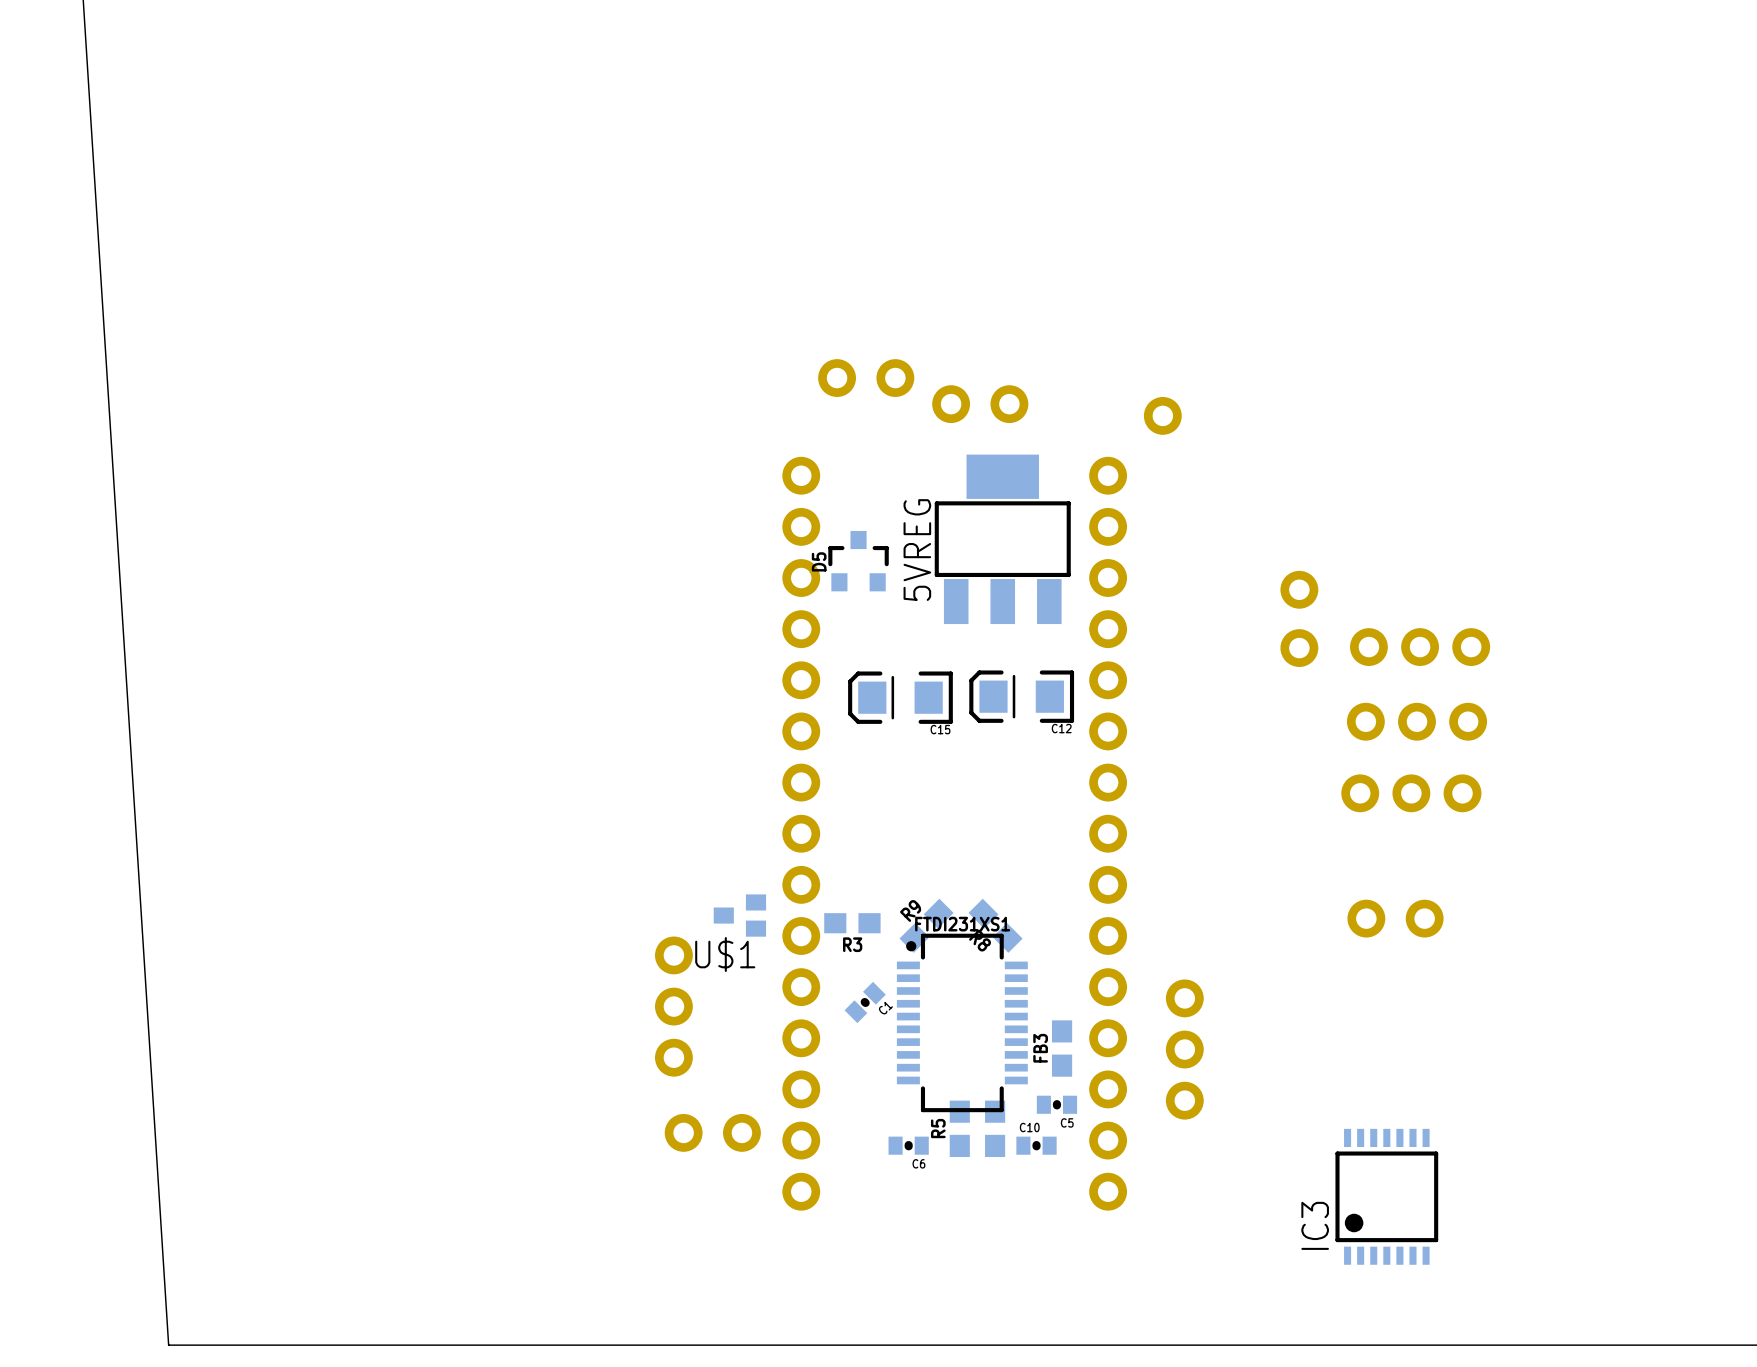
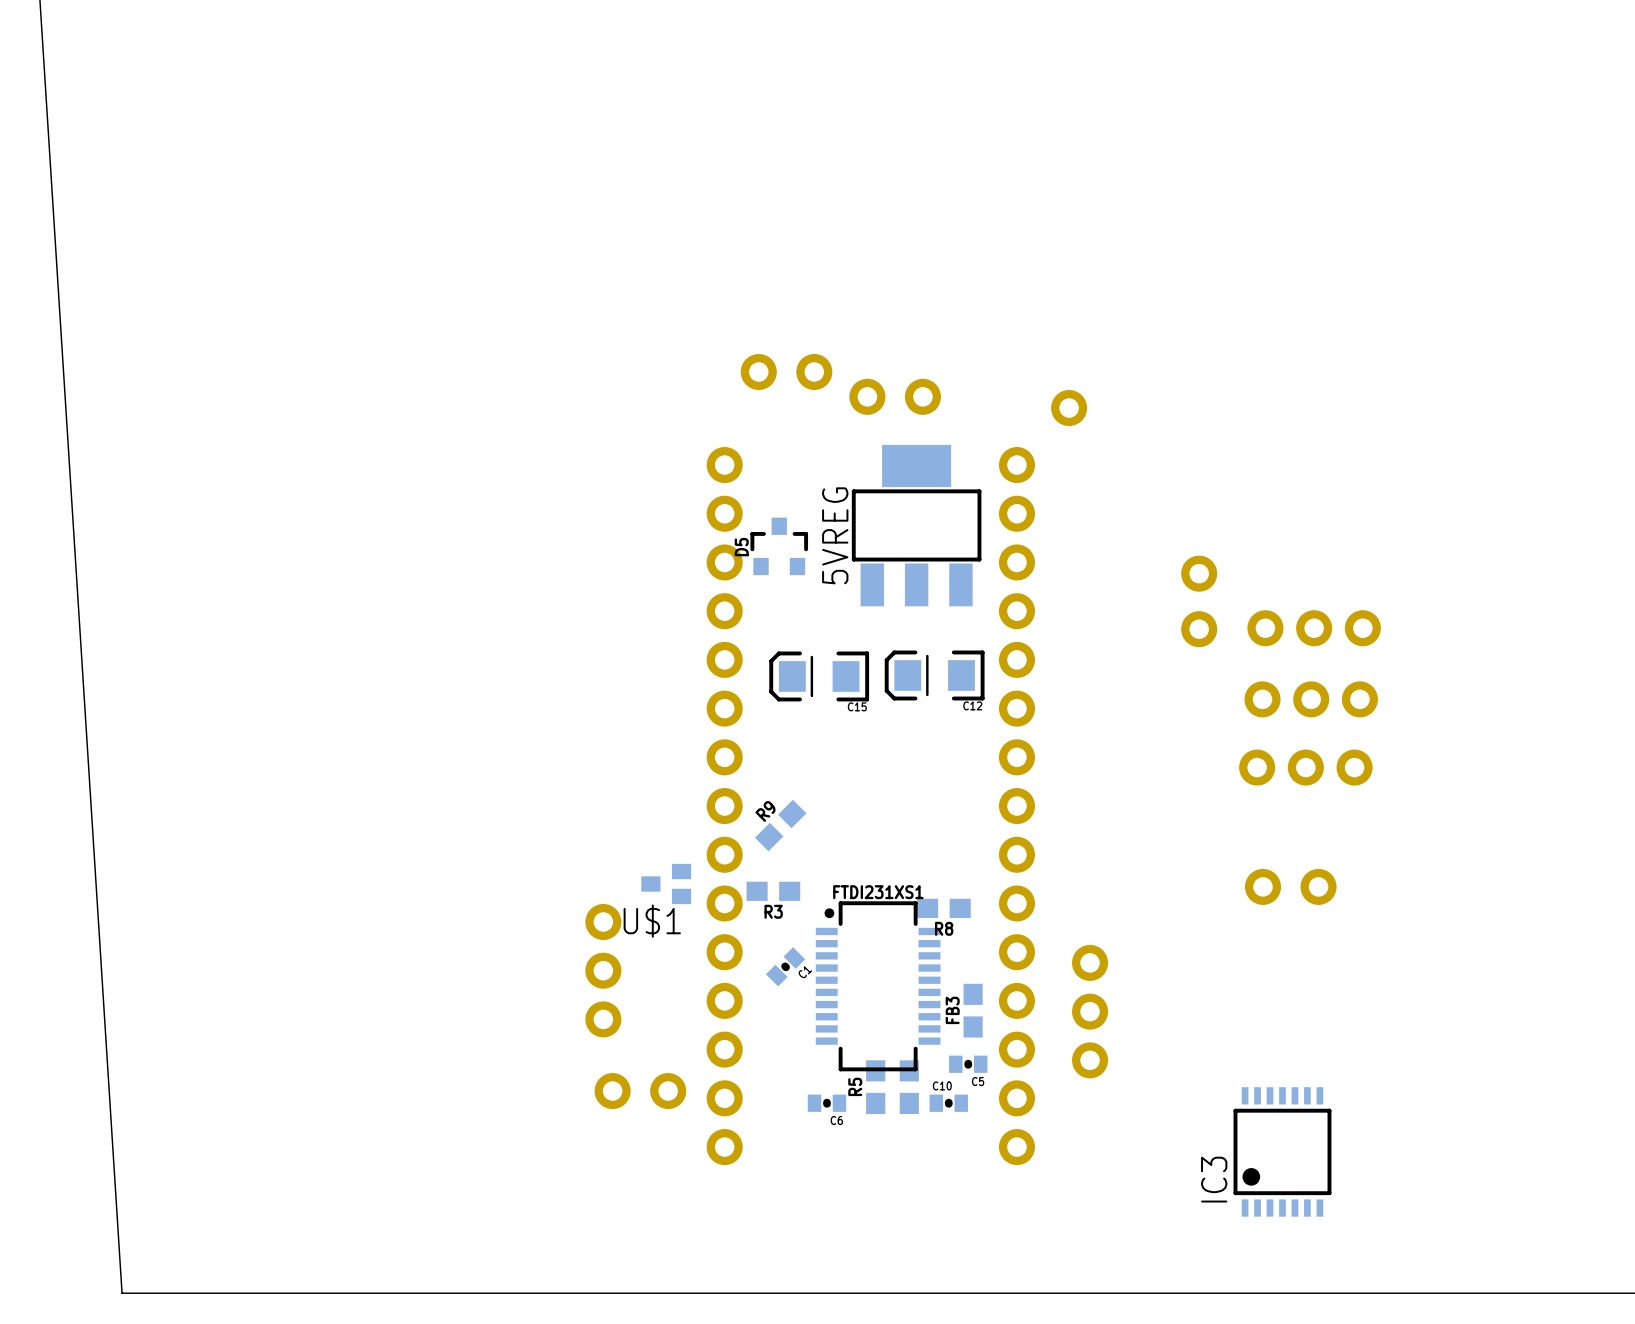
R9 position: (926, 925) -> (780, 825)
R8 rotation: 0° (995, 925) -> 45° counterclockwise (943, 908)
R8 position: (995, 925) -> (943, 908)

